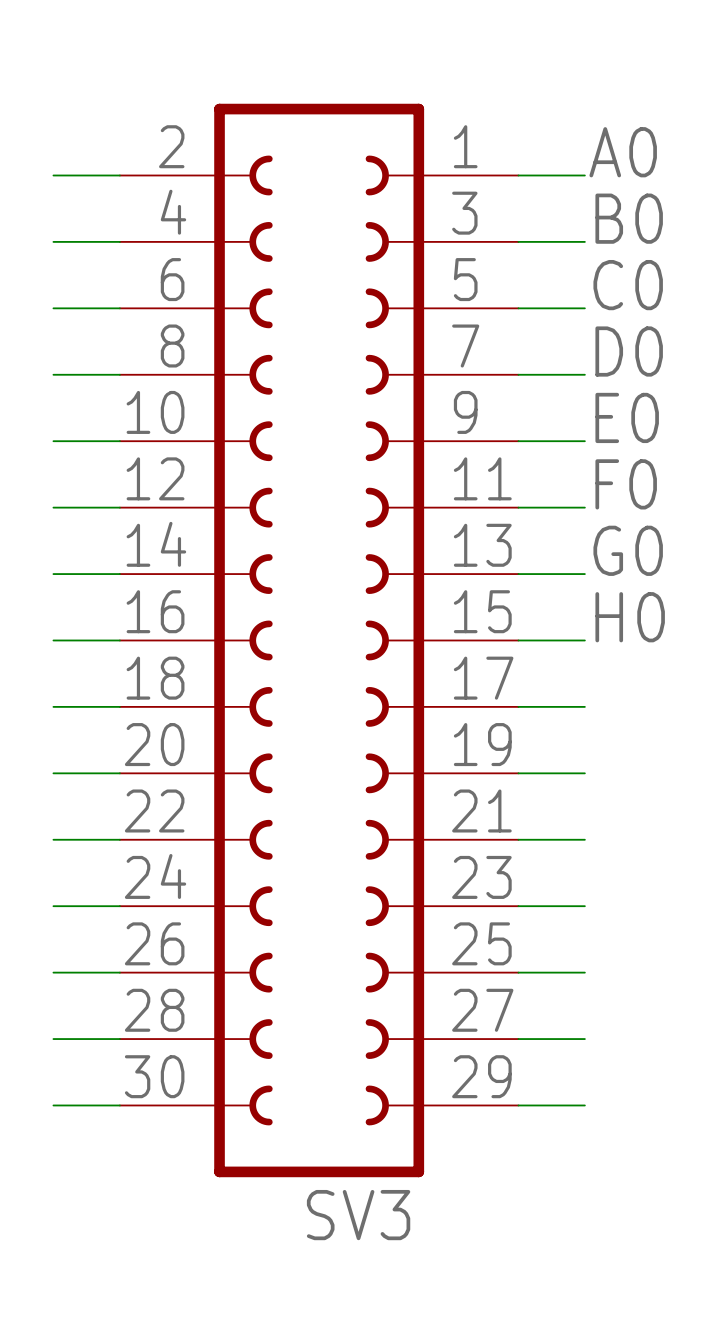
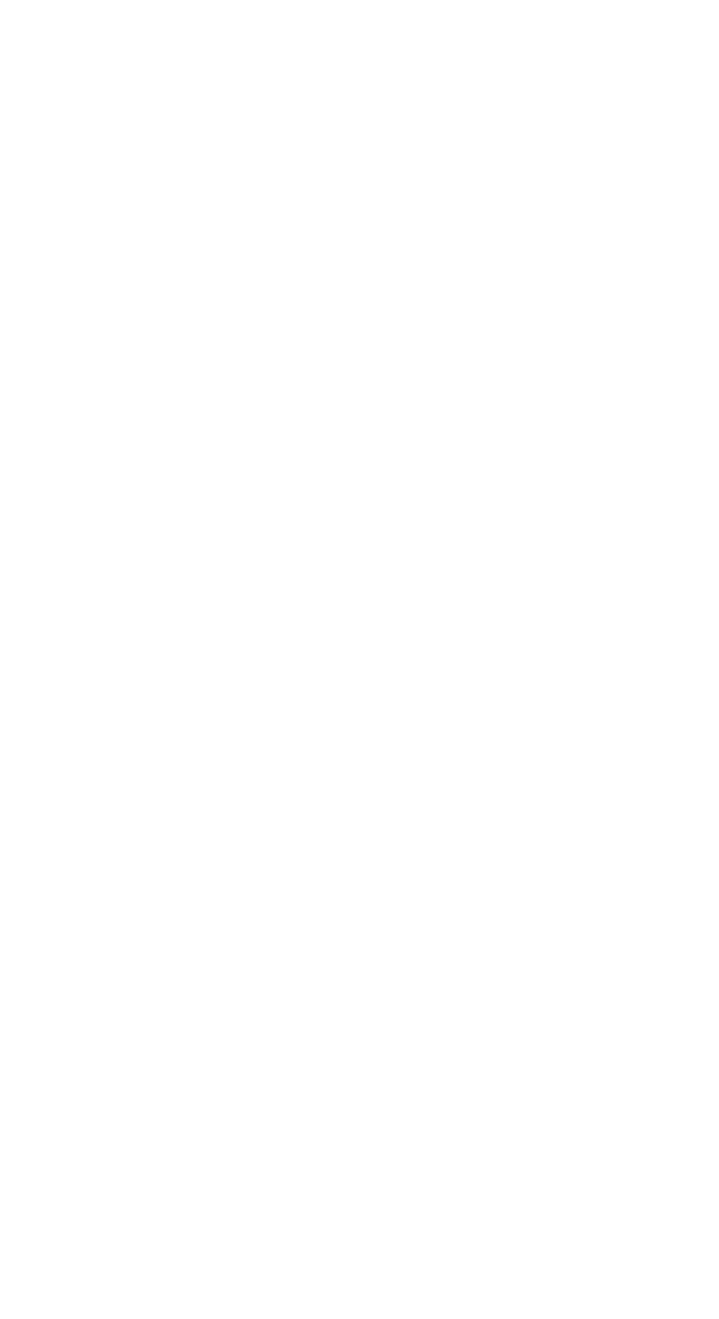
label: A0 (623, 152) -> none
wire: (53, 175) (119, 175) -> none
wire: (518, 175) (584, 175) -> none
label: B0 (629, 218) -> none
wire: (53, 241) (119, 241) -> none
wire: (518, 241) (584, 241) -> none
label: C0 (628, 285) -> none
wire: (53, 308) (119, 308) -> none
wire: (518, 308) (584, 308) -> none
label: D0 (629, 351) -> none
wire: (53, 374) (119, 374) -> none
wire: (518, 374) (584, 374) -> none
label: E0 (627, 417) -> none
wire: (53, 441) (119, 441) -> none
wire: (518, 441) (584, 441) -> none
label: F0 (626, 484) -> none
wire: (53, 507) (119, 507) -> none
wire: (518, 507) (584, 507) -> none
label: G0 (628, 550) -> none
wire: (53, 574) (119, 574) -> none
wire: (518, 574) (584, 574) -> none
label: H0 (630, 617) -> none
wire: (53, 640) (119, 640) -> none
SV3: (319, 640) -> none
wire: (518, 640) (584, 640) -> none
wire: (53, 706) (119, 706) -> none
wire: (518, 706) (584, 706) -> none
wire: (53, 773) (119, 773) -> none
wire: (518, 773) (584, 773) -> none
wire: (53, 839) (119, 839) -> none
wire: (518, 839) (584, 839) -> none
wire: (53, 906) (119, 906) -> none
wire: (518, 906) (584, 906) -> none
wire: (53, 972) (119, 972) -> none
wire: (518, 972) (584, 972) -> none
wire: (53, 1039) (119, 1039) -> none
wire: (518, 1039) (584, 1039) -> none
wire: (53, 1105) (119, 1105) -> none
wire: (518, 1105) (584, 1105) -> none

